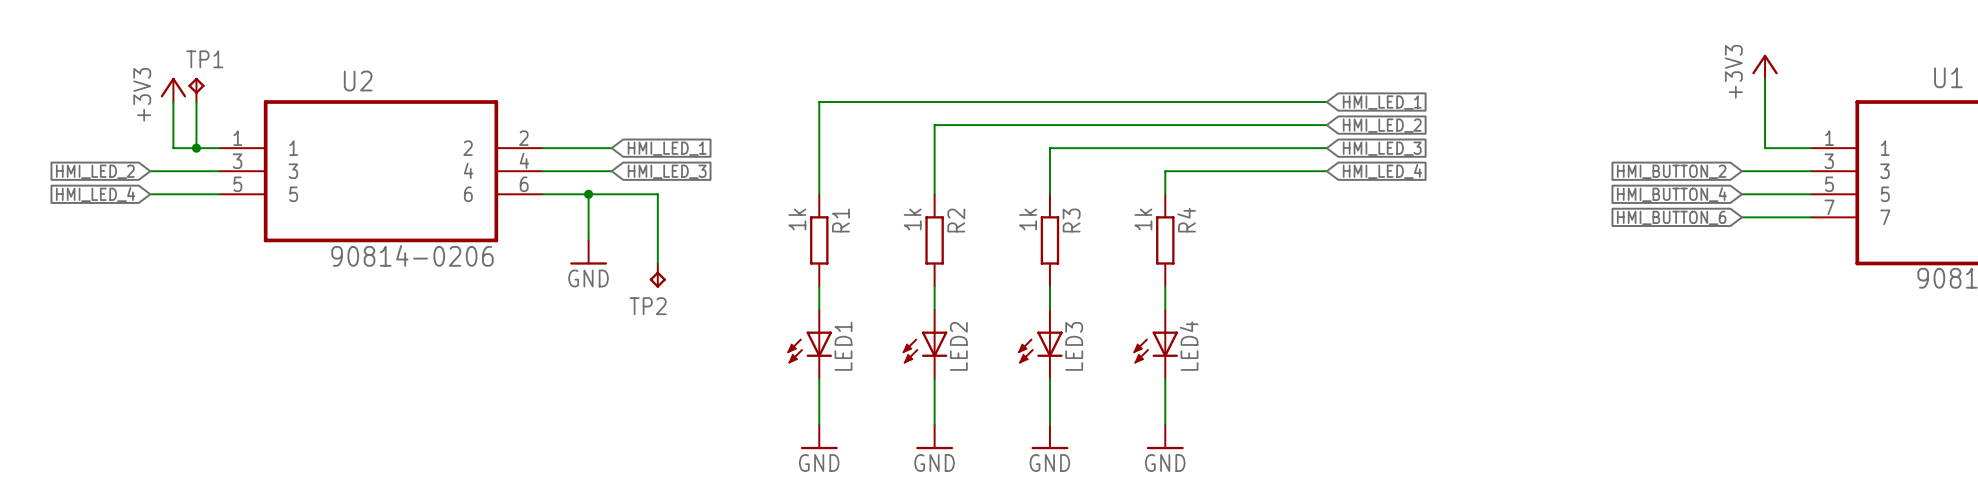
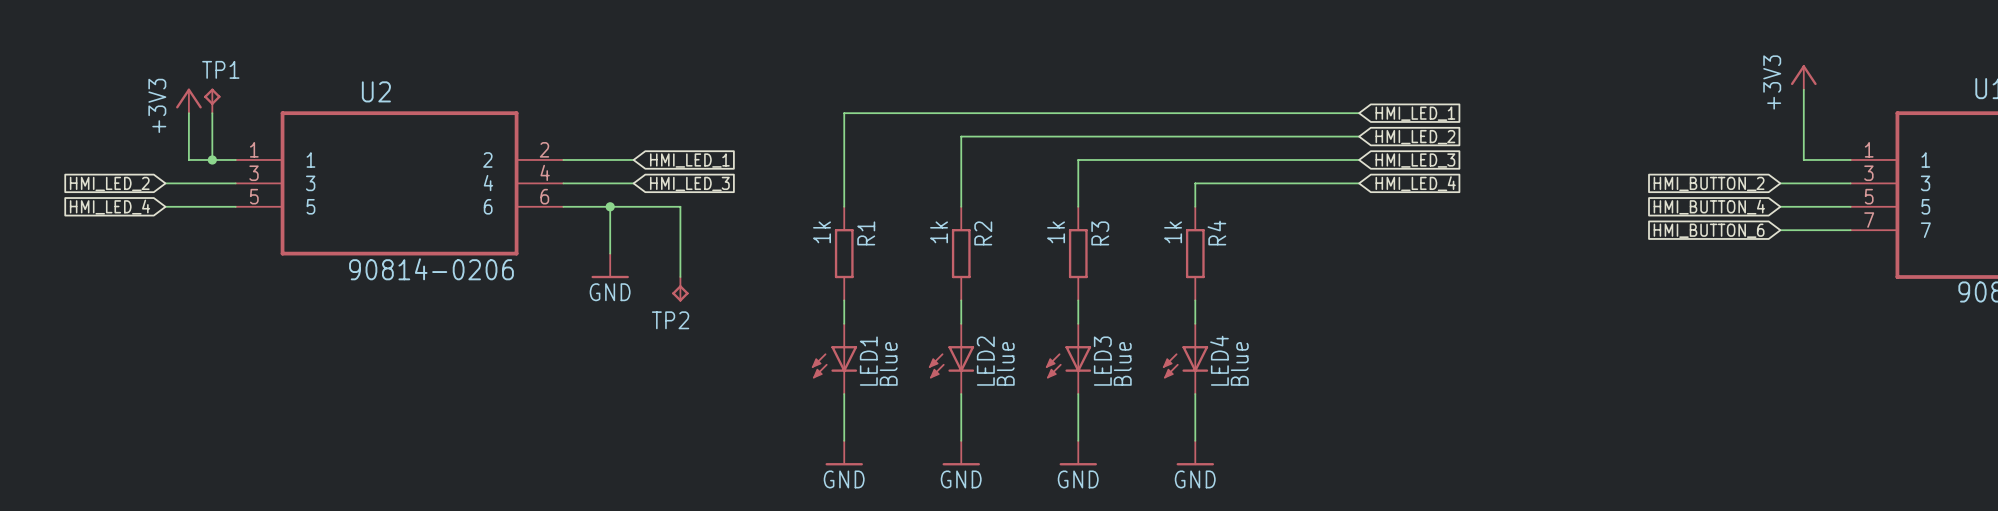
LED1 value: none -> Blue (888, 363)
LED2 value: none -> Blue (1005, 363)
LED3 value: none -> Blue (1122, 363)
LED4 value: none -> Blue (1239, 363)

